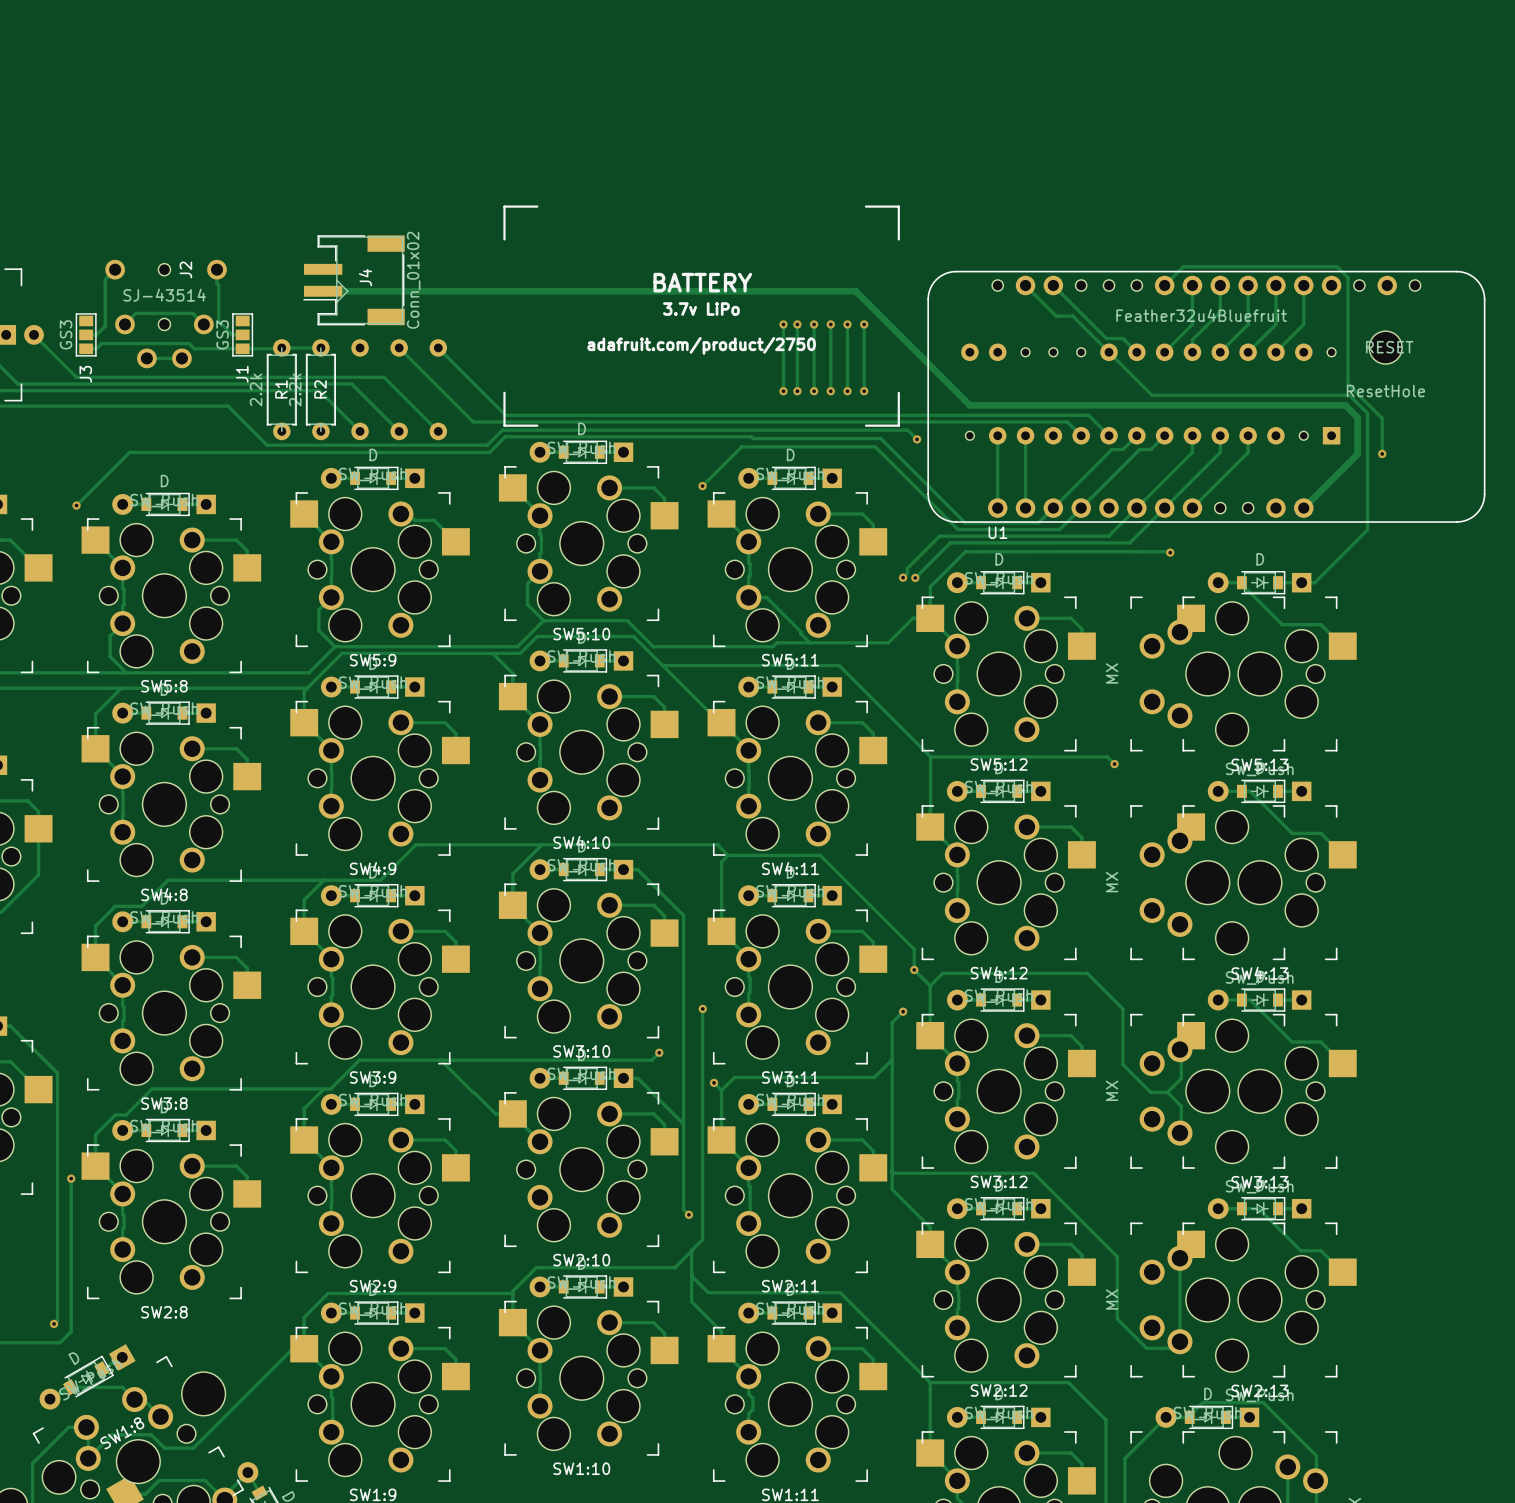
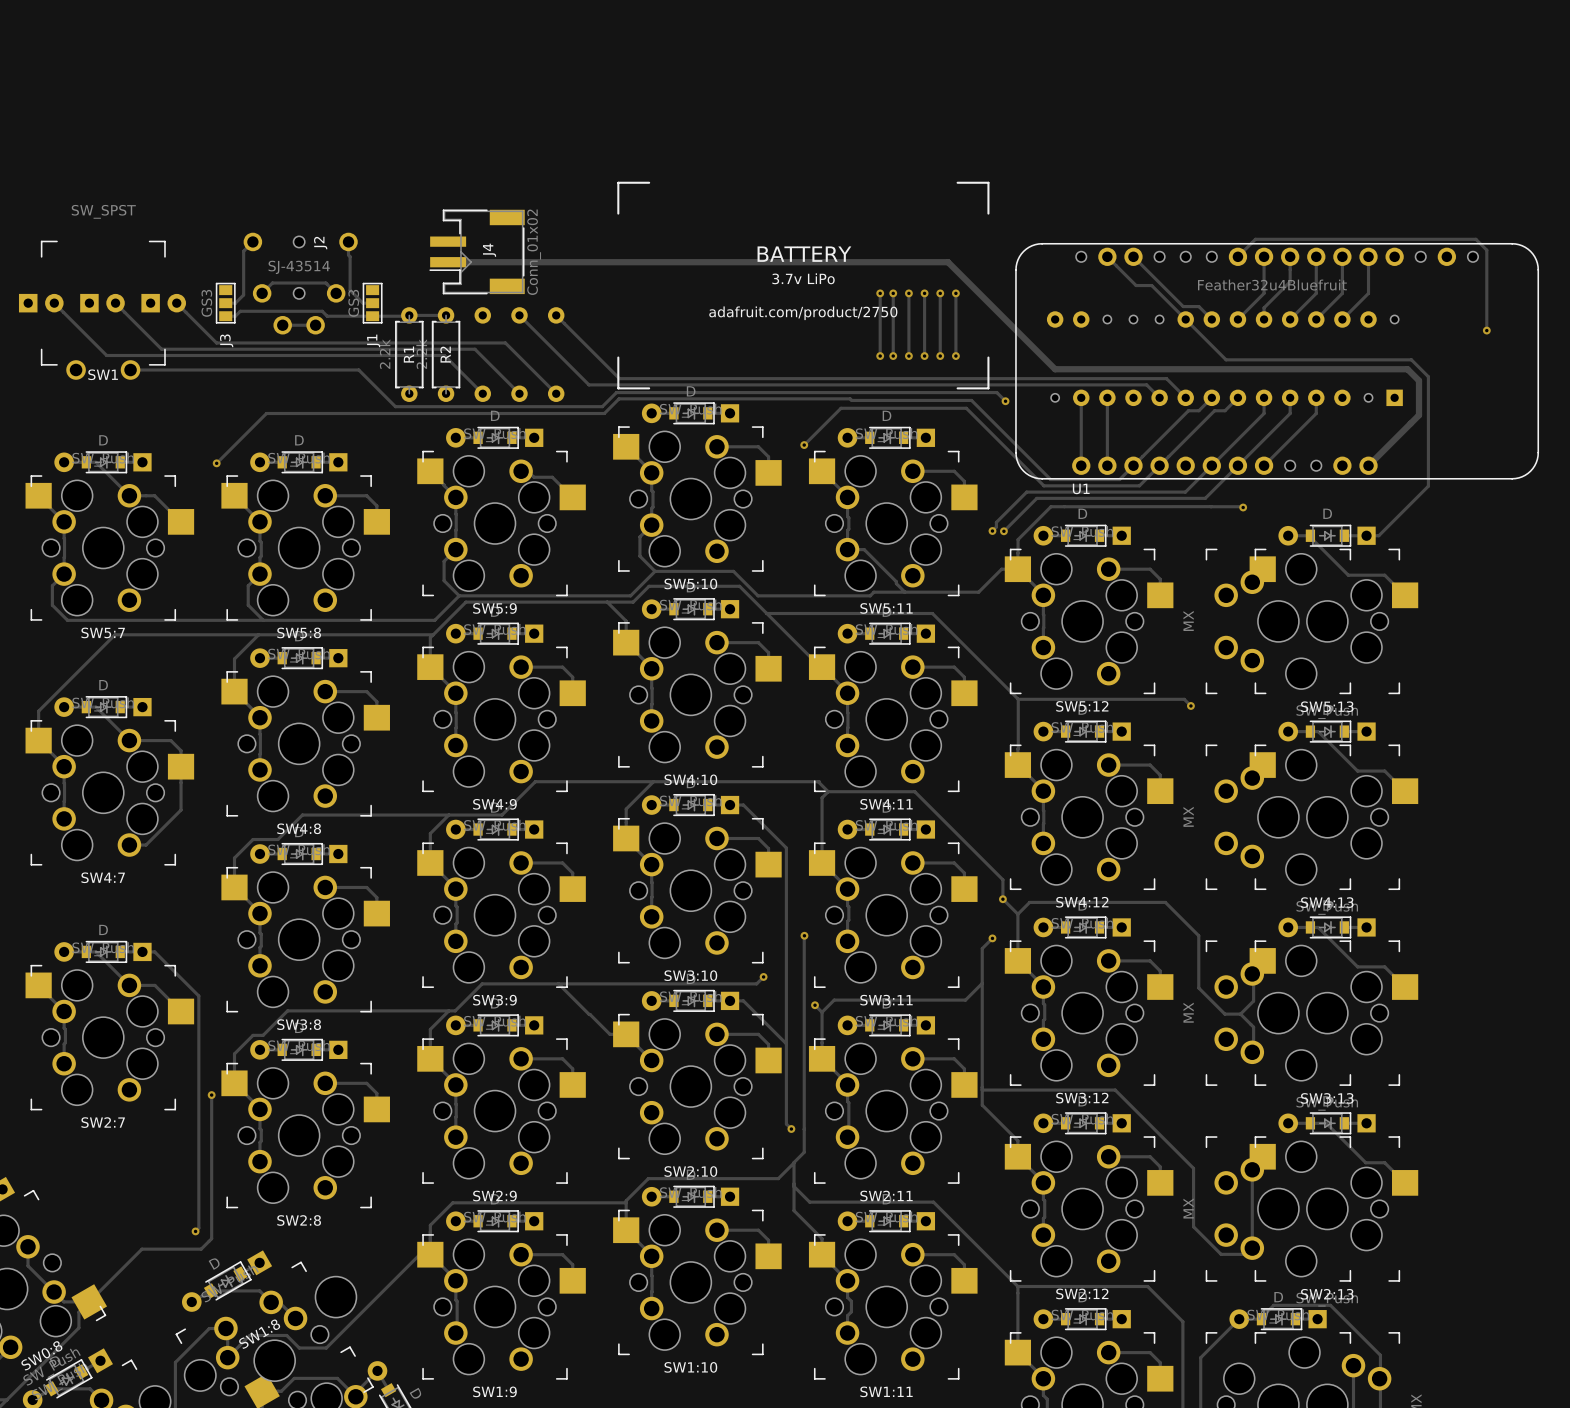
track: (1337, 266) (1348, 277) (1348, 384) (1382, 418) (1382, 453) -> (1399, 239) (1475, 239) (1486, 250) (1486, 330)
RESET: ResetHole (1385, 347) -> none
via: none -> (1486, 330)
via: (1382, 453) -> none

